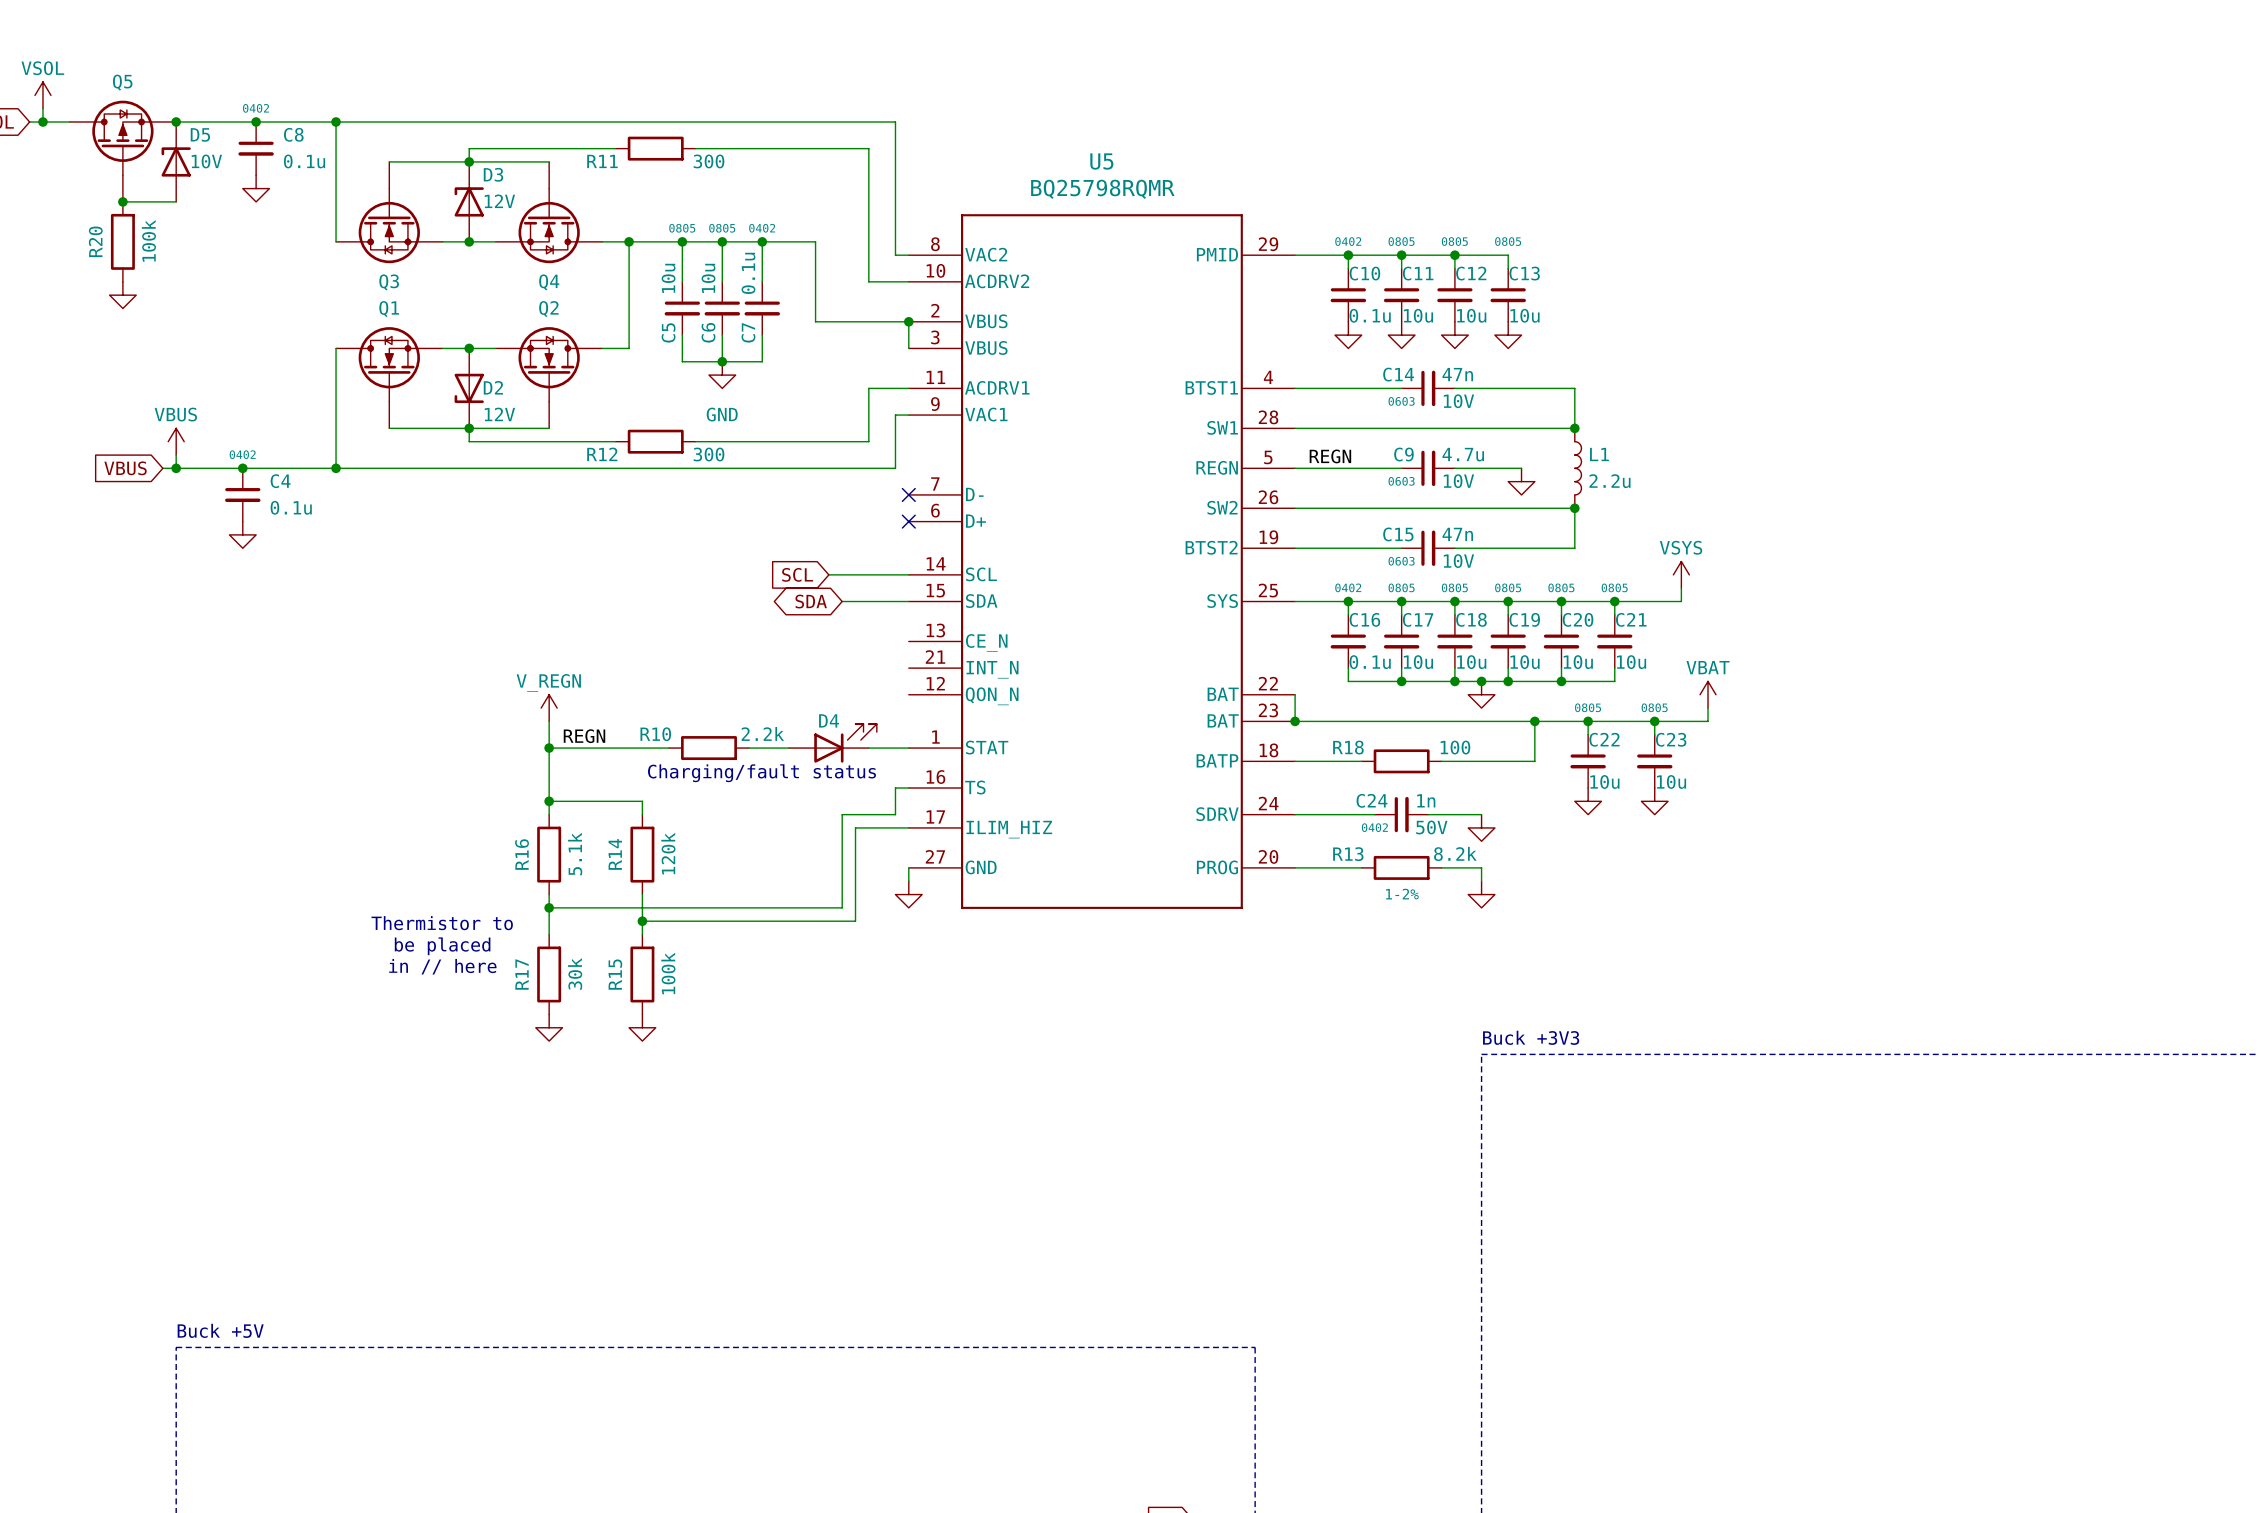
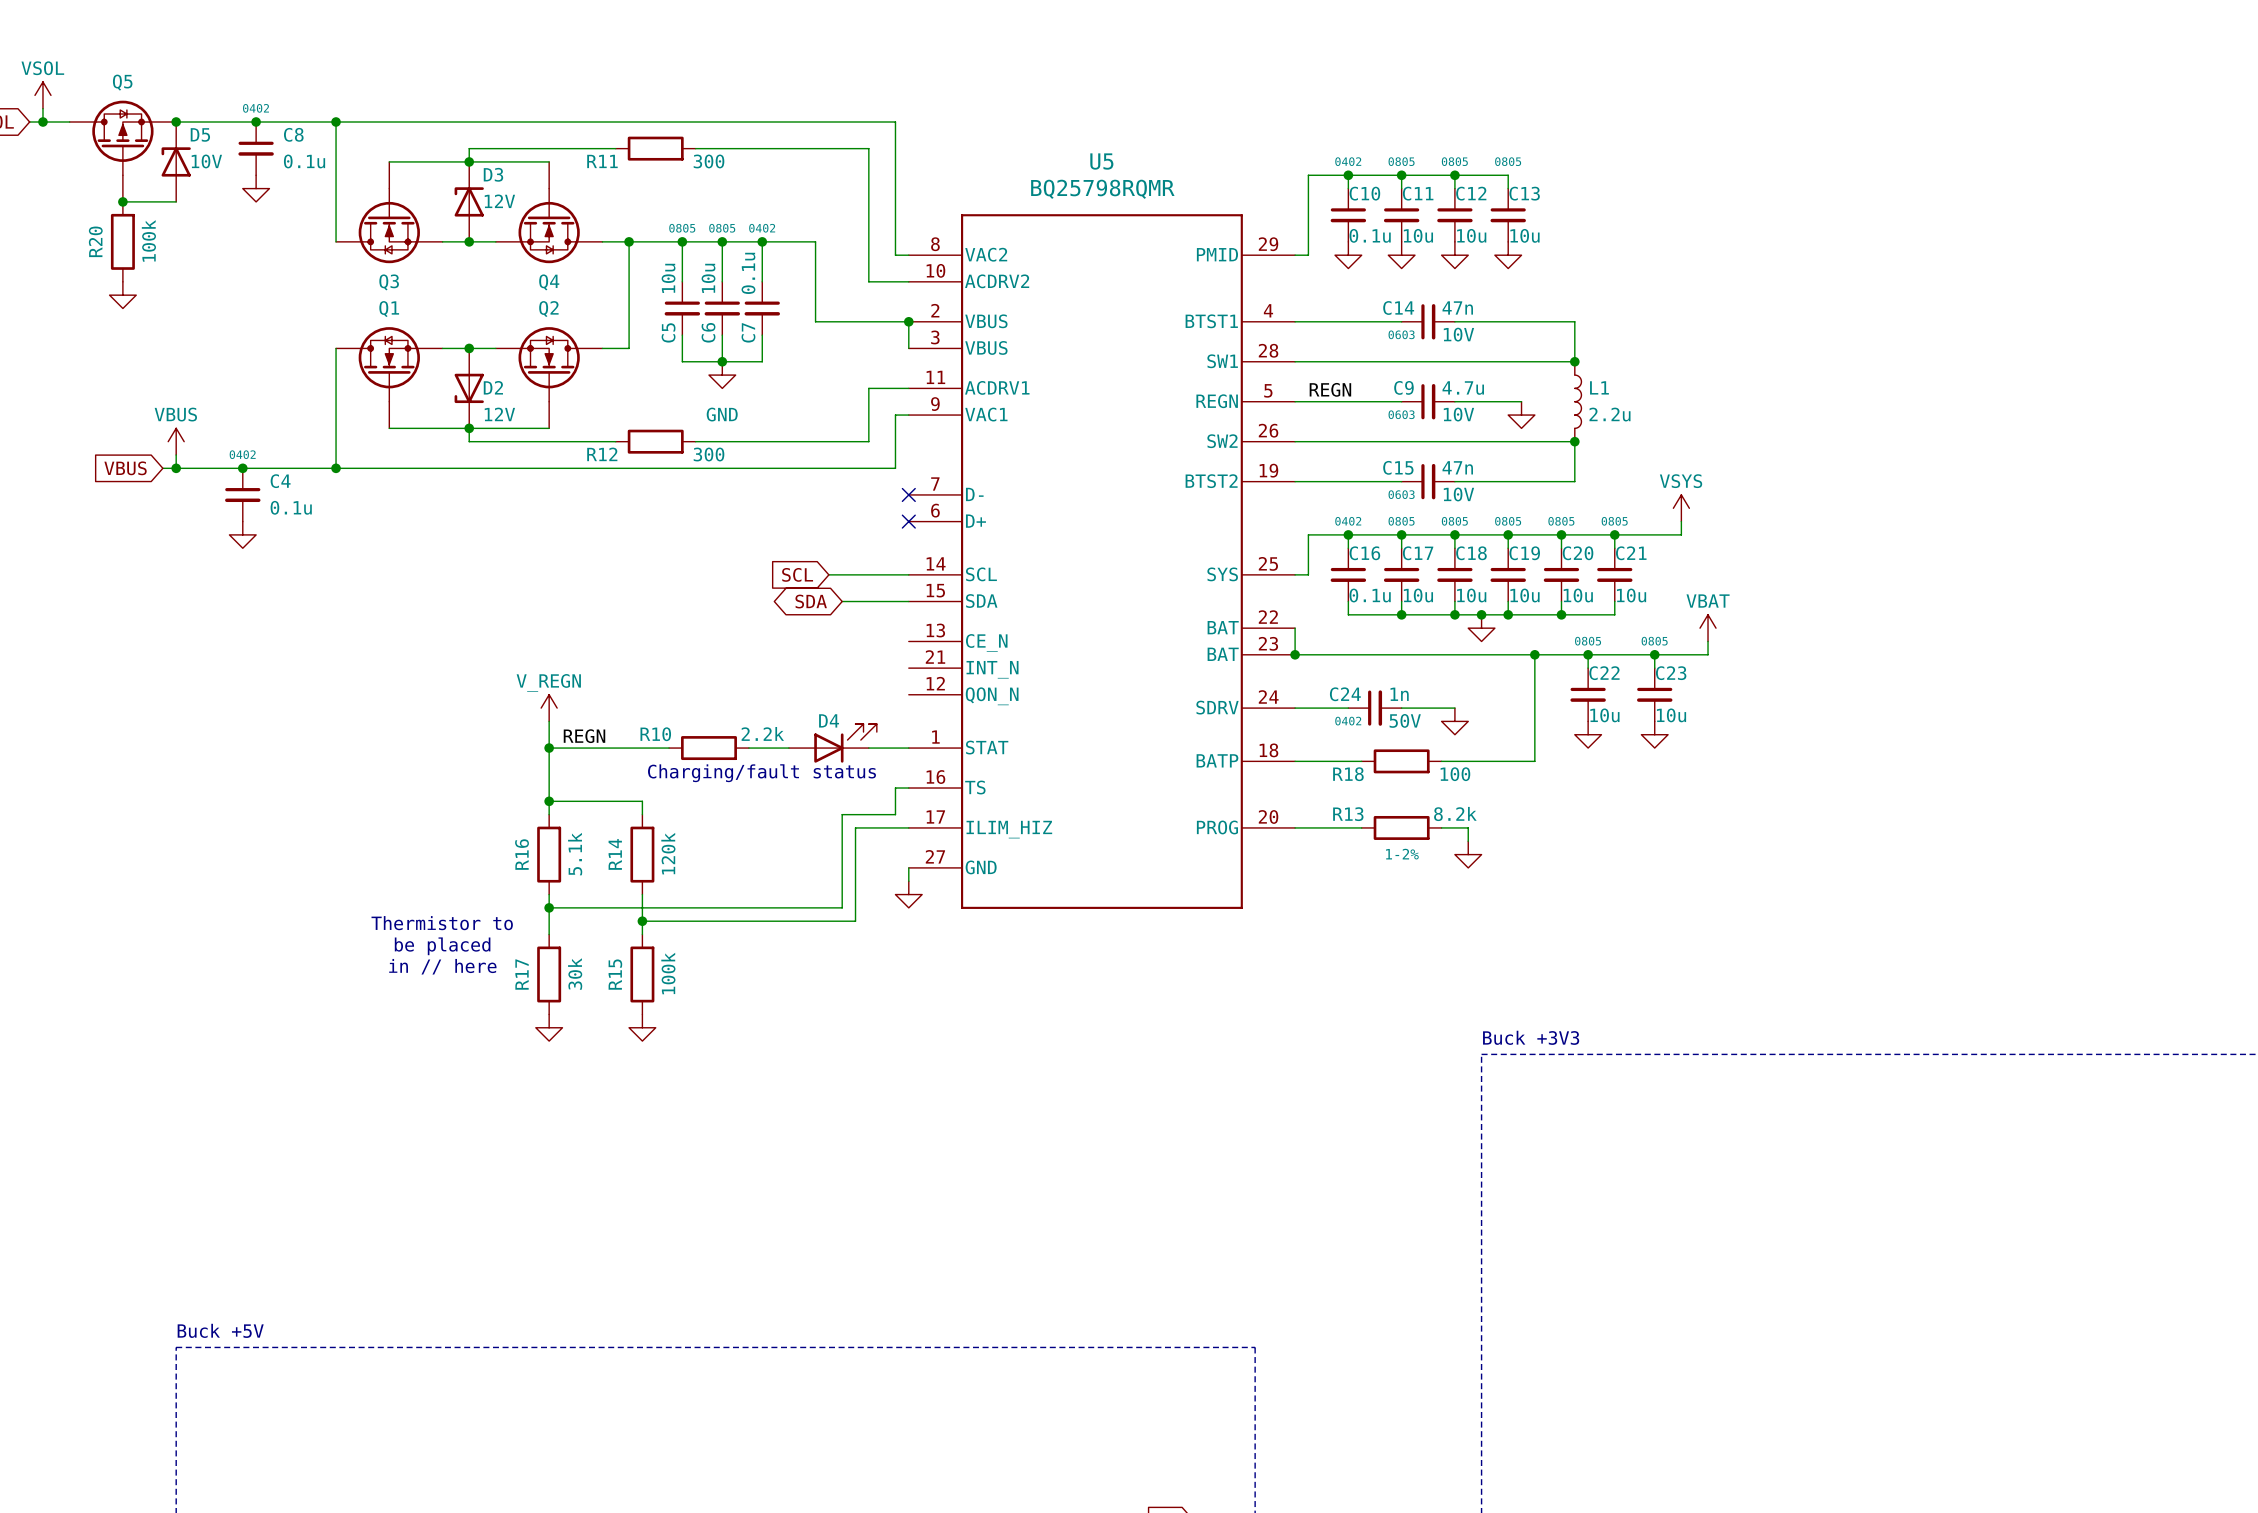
junction: none -> (1348, 175)
junction: none -> (1401, 175)
junction: none -> (1454, 175)
U5 symbol: [908, 214, 1296, 909] -> [908, 214, 1296, 909]
wire: (1308, 255) (1508, 255) (1508, 268) -> (1308, 255) (1308, 175) (1508, 175) (1508, 188)
wire: (1348, 255) (1348, 268) -> (1348, 175) (1348, 188)
junction: (1348, 255) -> none
power symbol: none -> (1348, 255)
wire: (1401, 255) (1401, 268) -> (1401, 175) (1401, 188)
junction: (1401, 255) -> none
power symbol: none -> (1401, 255)
wire: (1454, 255) (1454, 268) -> (1454, 175) (1454, 188)
junction: (1454, 255) -> none
power symbol: none -> (1454, 255)
power symbol: none -> (1508, 255)
C10 position: (1348, 295) -> (1348, 215)
C11 position: (1401, 295) -> (1401, 215)
C12 position: (1454, 295) -> (1454, 215)
C13 position: (1508, 295) -> (1508, 215)
power symbol: (1348, 335) -> none
power symbol: (1401, 335) -> none
power symbol: (1454, 335) -> none
power symbol: (1508, 335) -> none
junction: none -> (1574, 361)
wire: (1295, 388) (1401, 388) -> (1295, 321) (1401, 321)
C14 position: (1428, 388) -> (1428, 321)
wire: (1454, 388) (1574, 388) (1574, 428) (1295, 428) -> (1454, 321) (1574, 321) (1574, 361) (1295, 361)
power symbol: none -> (1521, 415)
junction position: (1574, 428) -> (1574, 441)
wire: none -> (1295, 441) (1574, 441) (1574, 481) (1454, 481)
label position: REGN (1330, 456) -> REGN (1330, 389)
wire: (1295, 468) (1401, 468) -> (1295, 401) (1401, 401)
C9 position: (1428, 468) -> (1428, 401)
wire: (1454, 468) (1521, 468) -> (1454, 401) (1521, 401)
L1 position: (1578, 468) -> (1578, 401)
wire: none -> (1295, 481) (1401, 481)
power symbol: (1521, 481) -> none
wire: (1295, 508) (1574, 508) (1574, 548) (1454, 548) -> (1454, 534) (1454, 548)
junction: (1574, 508) -> none
wire: none -> (1681, 521) (1681, 534) (1308, 534) (1308, 574) (1295, 574)
junction: none -> (1348, 534)
junction: none -> (1401, 534)
junction: none -> (1454, 534)
junction: none -> (1508, 534)
junction: none -> (1561, 534)
junction: none -> (1614, 534)
wire: (1295, 548) (1401, 548) -> (1401, 534) (1401, 548)
C15 position: (1428, 548) -> (1428, 481)
power symbol position: VSYS (1681, 574) -> VSYS (1681, 508)
wire: (1681, 588) (1681, 601) (1295, 601) -> none
junction: (1348, 601) -> none
junction position: (1401, 601) -> (1401, 614)
junction position: (1454, 601) -> (1454, 614)
junction position: (1508, 601) -> (1508, 614)
junction position: (1561, 601) -> (1561, 614)
junction: (1614, 601) -> none
wire: none -> (1348, 614) (1614, 614)
junction: none -> (1481, 614)
power symbol: none -> (1481, 628)
C16 position: (1348, 641) -> (1348, 574)
C17 position: (1401, 641) -> (1401, 574)
C18 position: (1454, 641) -> (1454, 574)
C19 position: (1508, 641) -> (1508, 574)
C20 position: (1561, 641) -> (1561, 574)
C21 position: (1614, 641) -> (1614, 574)
junction: none -> (1295, 654)
wire: none -> (1534, 654) (1534, 721)
junction: none -> (1534, 654)
junction: none -> (1588, 654)
junction: none -> (1654, 654)
wire: (1348, 668) (1348, 681) (1614, 681) (1614, 668) -> none
wire: (1401, 668) (1401, 681) -> (1348, 534) (1348, 548)
wire: (1454, 668) (1454, 681) -> (1614, 534) (1614, 548)
wire: (1508, 668) (1508, 681) -> (1508, 534) (1508, 548)
wire: (1561, 668) (1561, 681) -> (1561, 534) (1561, 548)
junction: (1401, 681) -> none
junction: (1454, 681) -> none
junction: (1481, 681) -> none
junction: (1508, 681) -> none
junction: (1561, 681) -> none
wire: (1295, 694) (1295, 721) (1708, 721) (1708, 708) -> (1295, 628) (1295, 654) (1708, 654) (1708, 641)
power symbol: (1481, 694) -> none
power symbol position: VBAT (1708, 694) -> VBAT (1708, 628)
wire: none -> (1295, 708) (1348, 708)
junction: (1295, 721) -> none
power symbol: none -> (1454, 721)
junction: (1534, 721) -> none
junction: (1588, 721) -> none
junction: (1654, 721) -> none
power symbol: none -> (1588, 734)
power symbol: none -> (1654, 734)
R18 name position: R18 (1348, 747) -> R18 (1348, 774)
R18 value position: 100 (1455, 747) -> 100 (1455, 774)
C22 position: (1588, 761) -> (1588, 694)
C23 position: (1654, 761) -> (1654, 694)
power symbol: (1588, 801) -> none
power symbol: (1654, 801) -> none
wire: (1295, 814) (1375, 814) -> none
C24 position: (1401, 814) -> (1375, 708)
wire: (1428, 814) (1481, 814) -> (1401, 708) (1454, 708)
wire: none -> (1441, 827) (1468, 827) (1468, 841)
power symbol: (1481, 827) -> none
power symbol: none -> (1468, 854)
wire: (1295, 867) (1361, 867) -> (1295, 827) (1361, 827)
R13 position: (1401, 867) -> (1401, 827)
wire: (1441, 867) (1481, 867) (1481, 881) -> none
power symbol: (1481, 894) -> none

